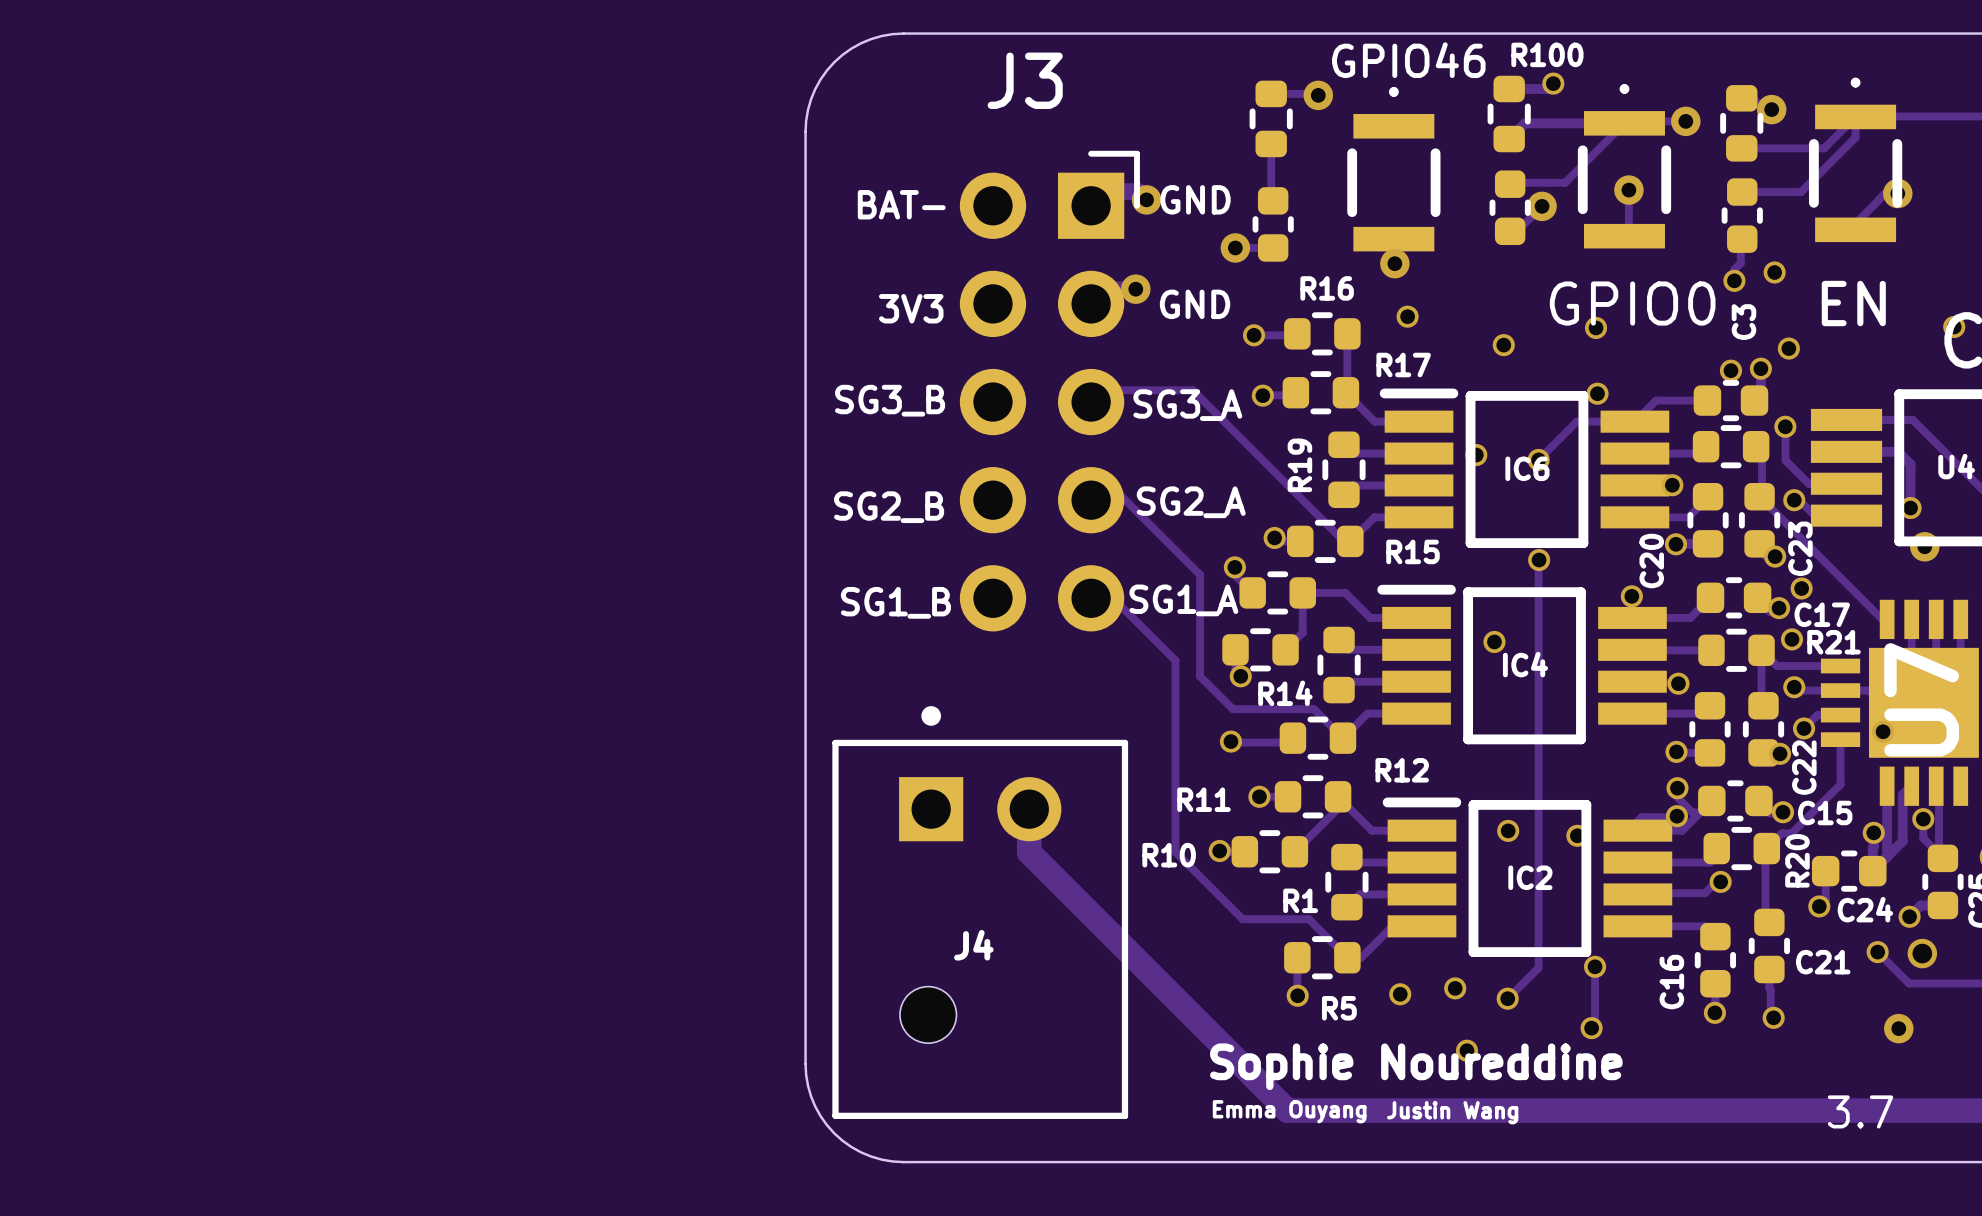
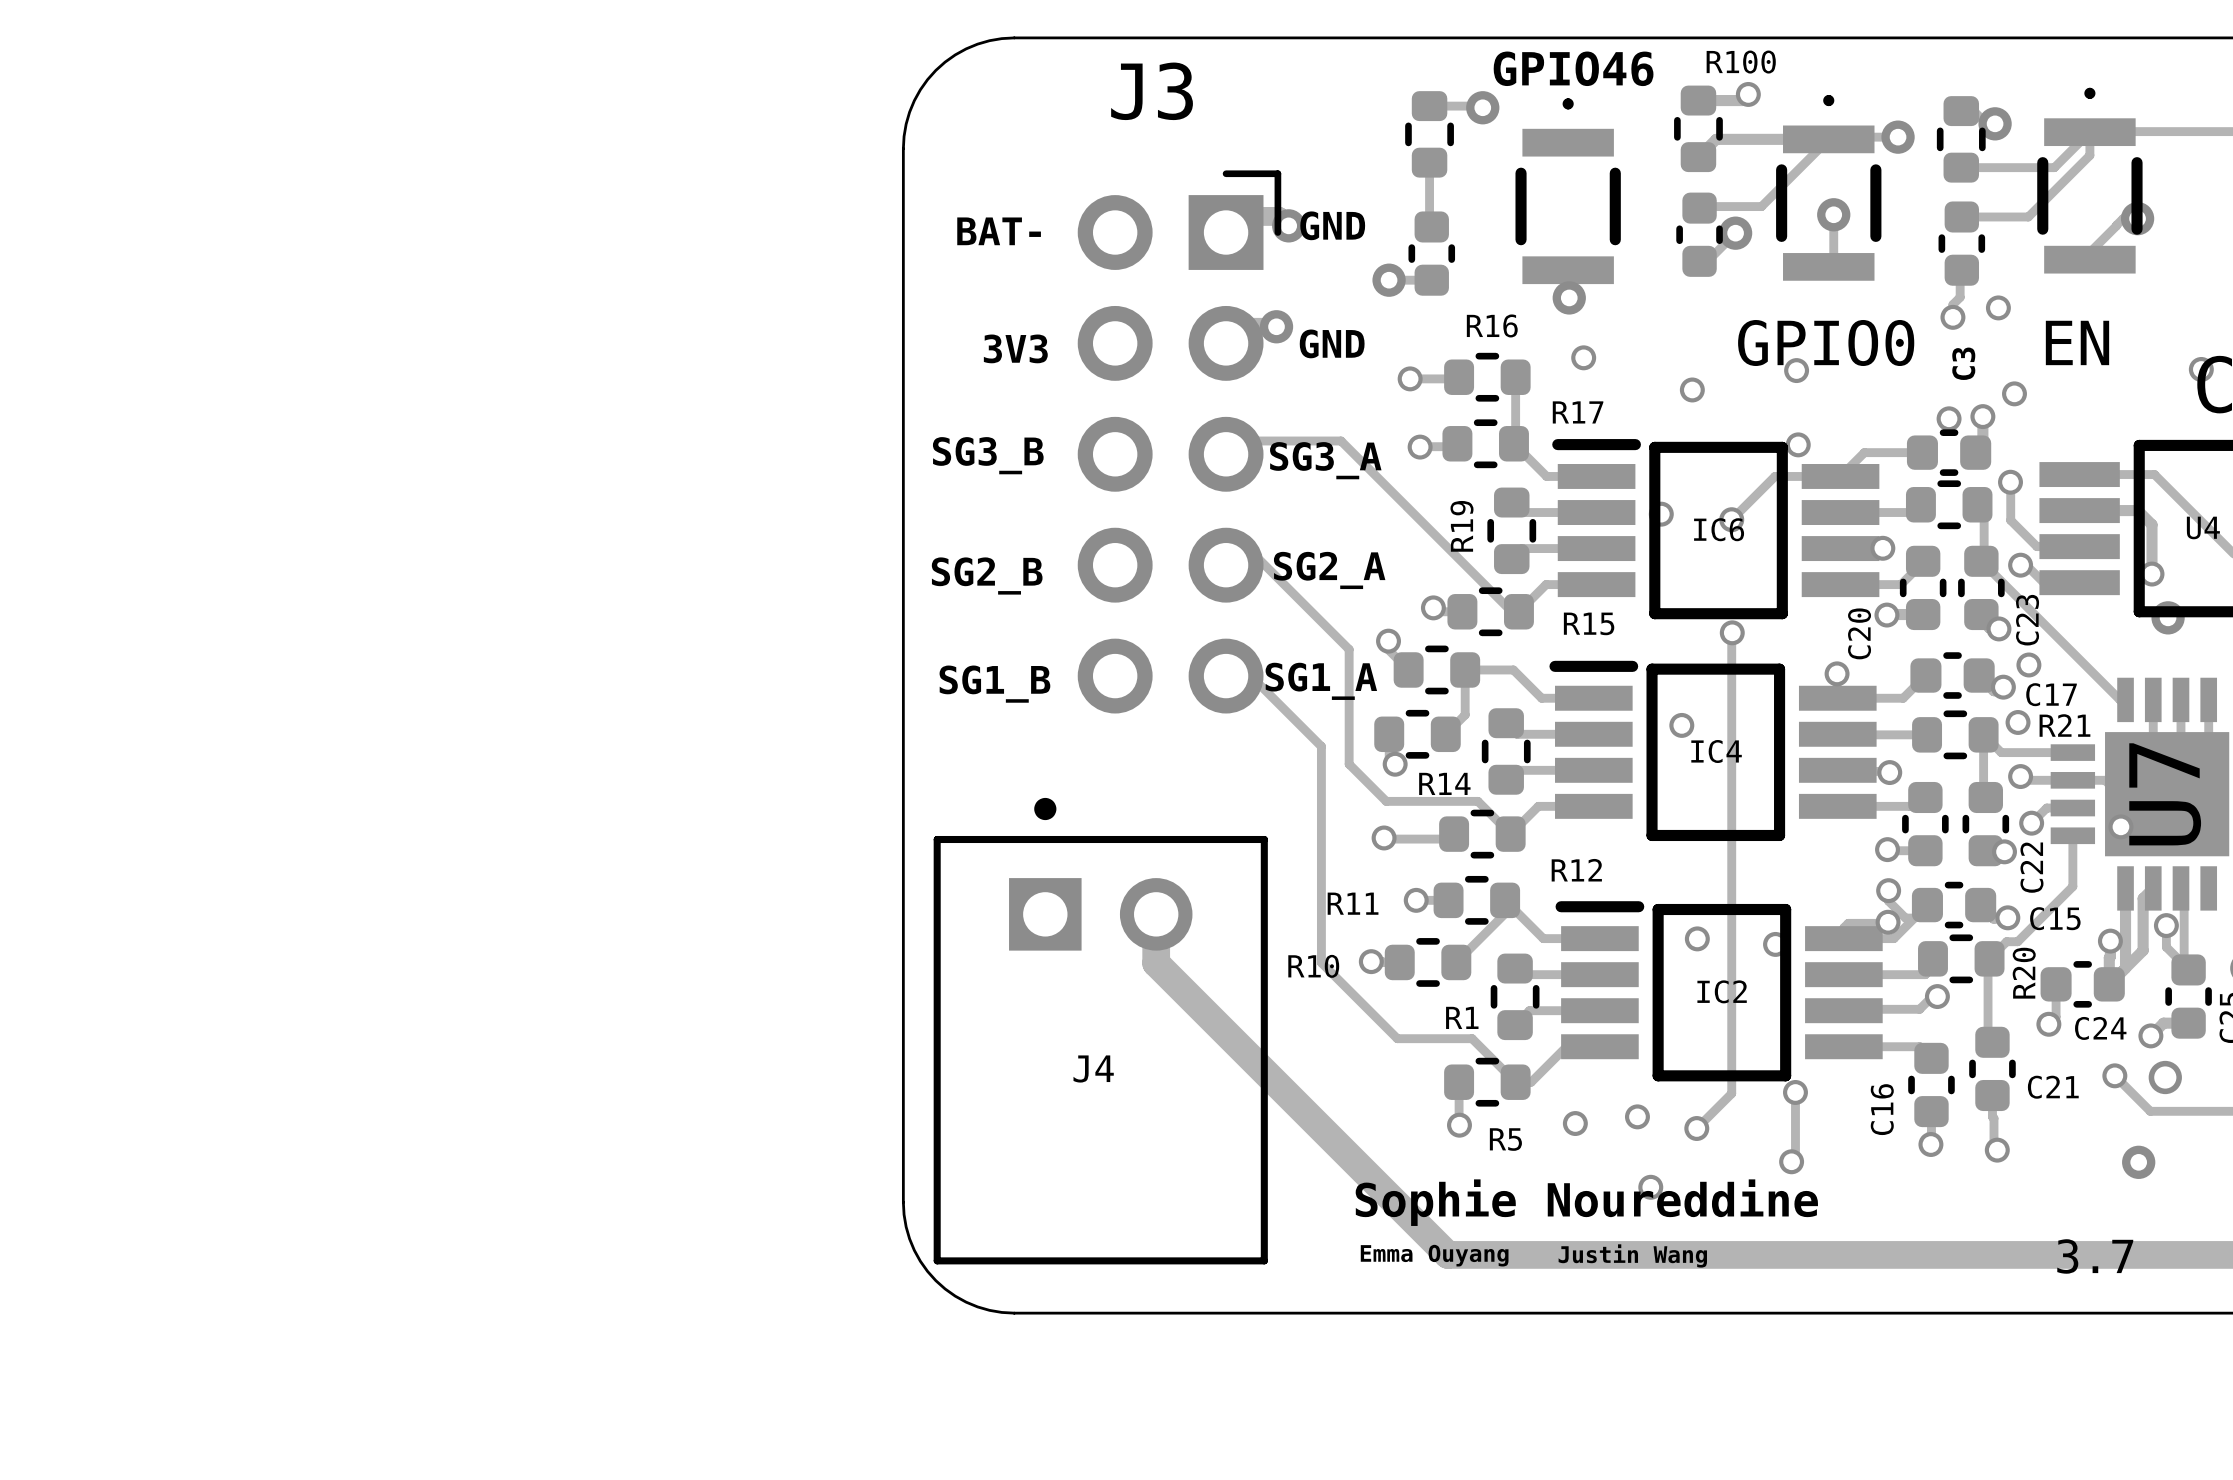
part: (928, 1014) -> none

